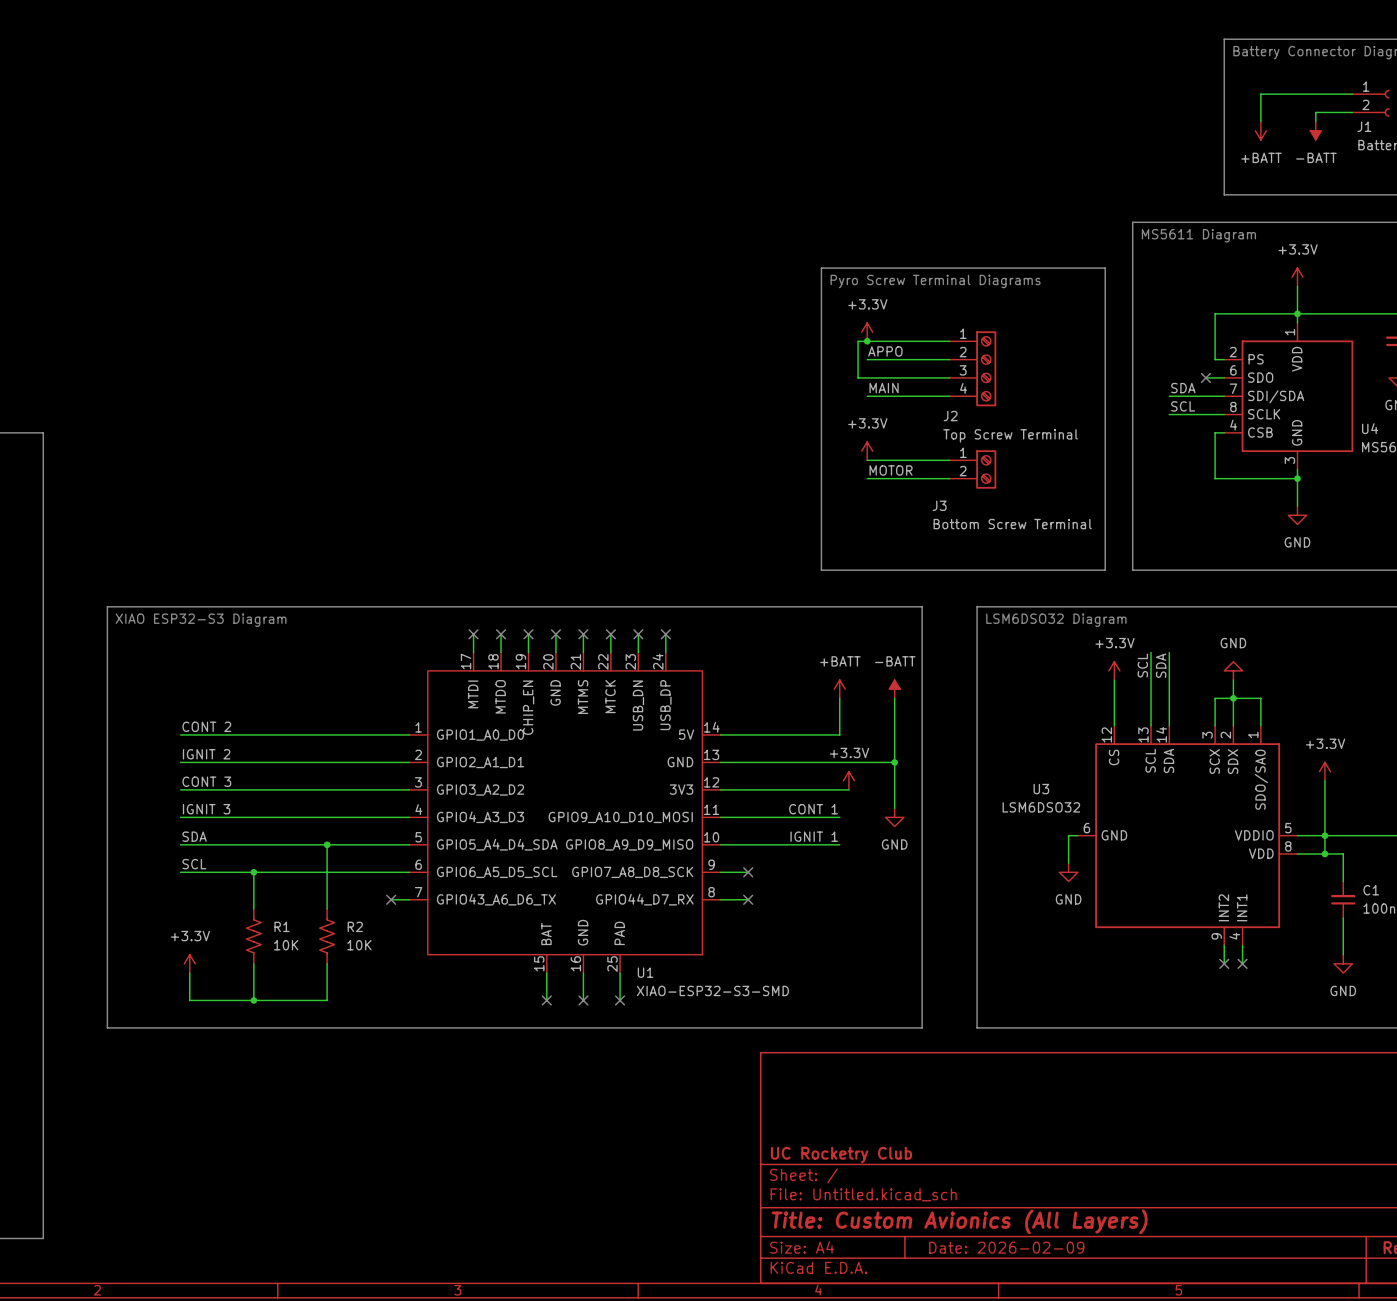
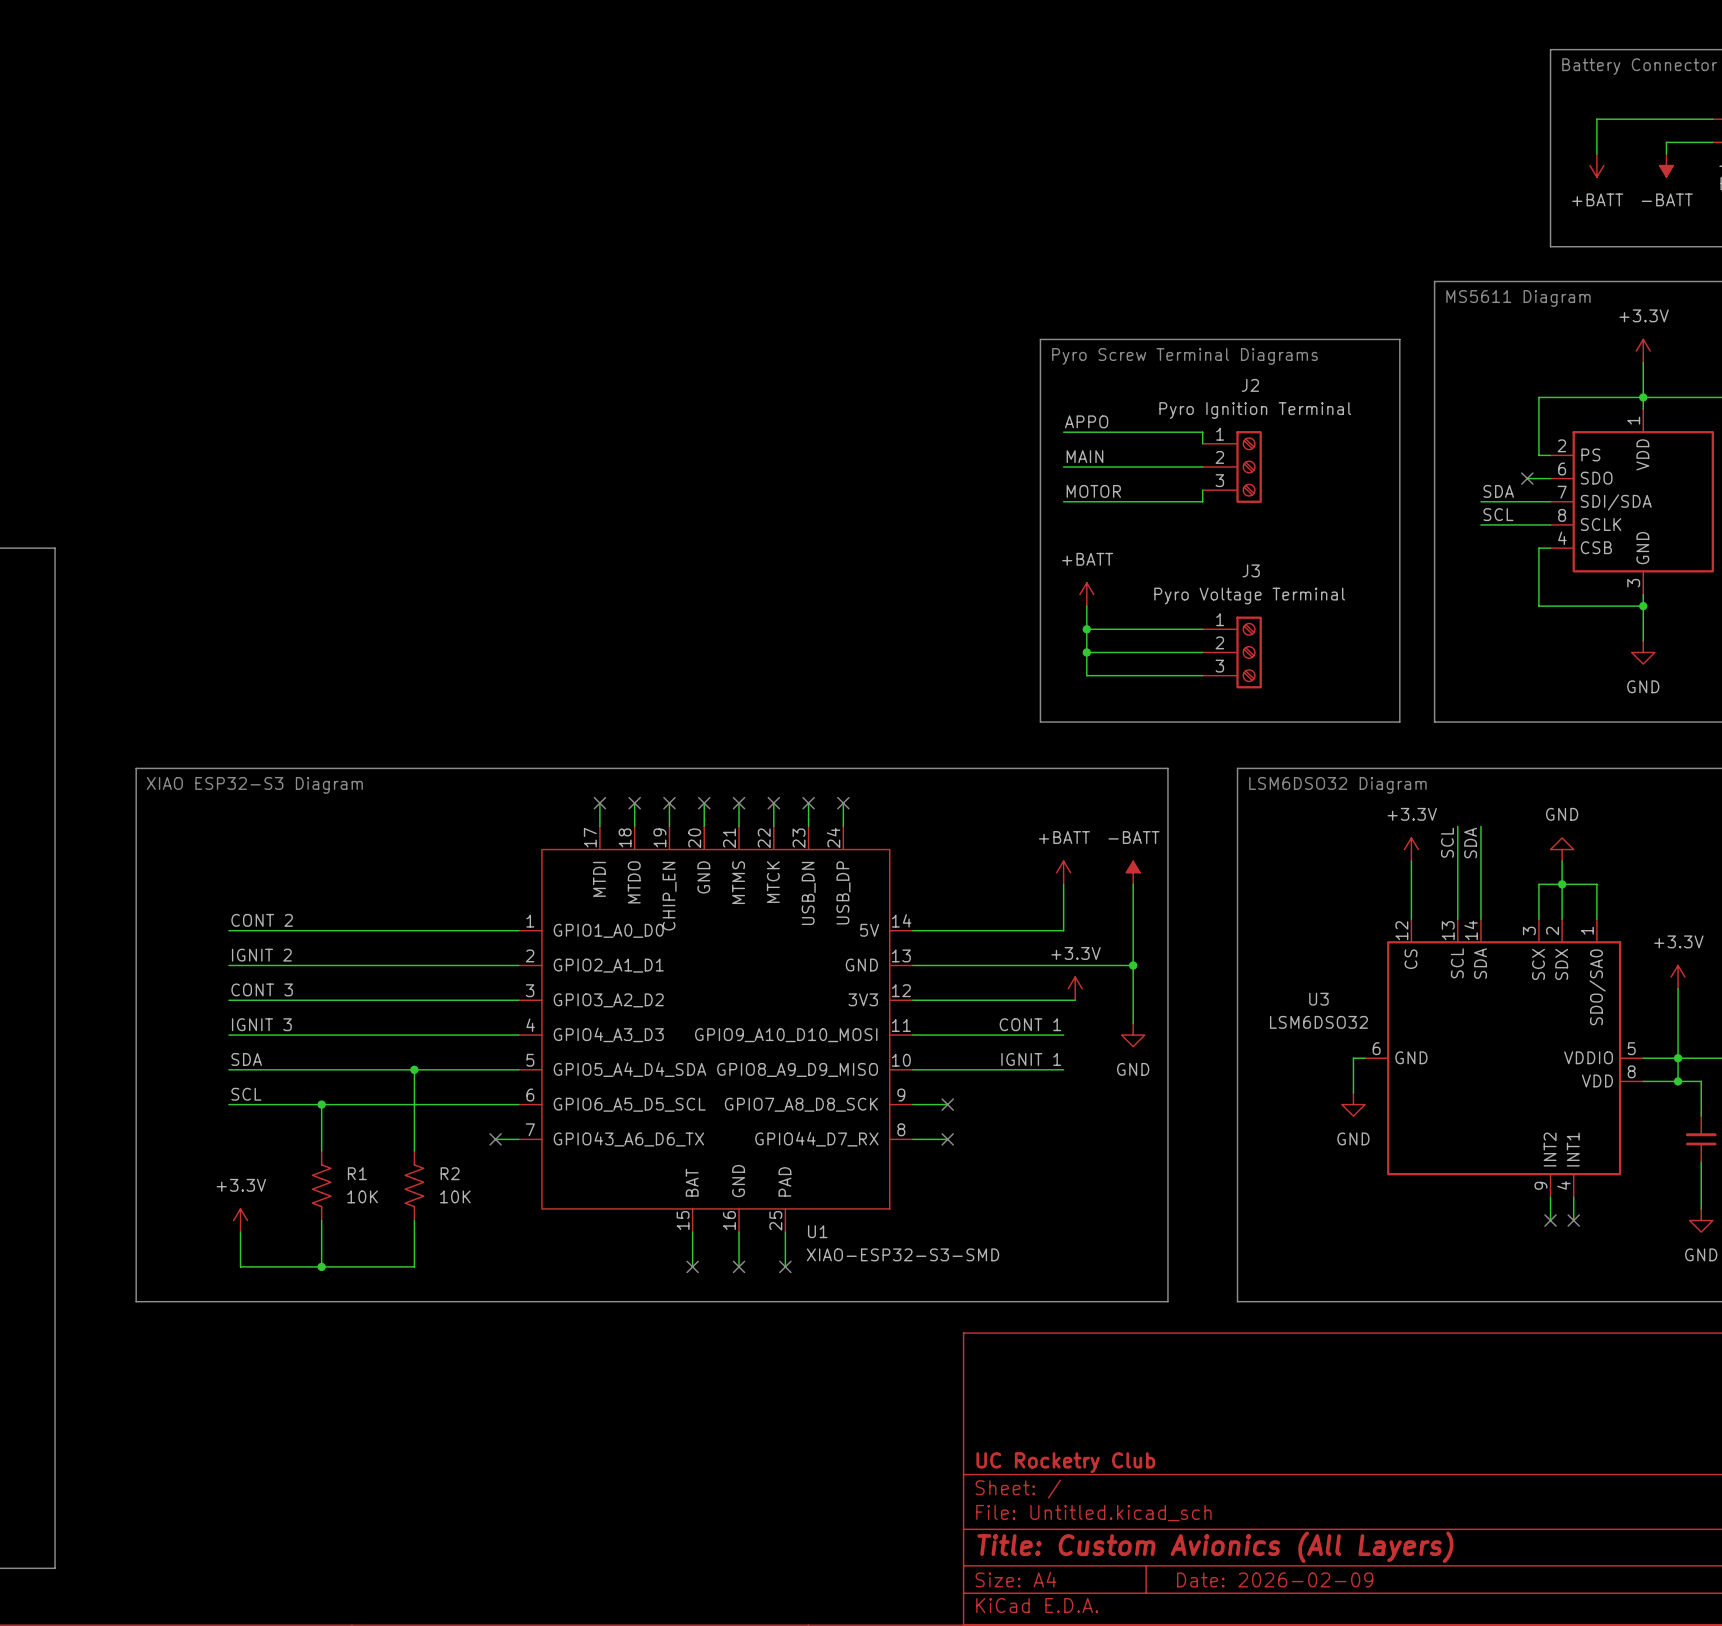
J2 symbol: [949, 331, 997, 407] -> [1202, 431, 1262, 503]
power symbol: +3.3V (867, 332) -> none
wire: (858, 341) (858, 377) (949, 377) -> (1086, 432) (1063, 432)
junction: (867, 341) -> none
wire: none -> (1202, 432) (1202, 443)
label position: APPO (885, 351) -> APPO (1086, 421)
wire: (867, 359) (949, 359) -> none
wire: none -> (1063, 466) (1202, 466)
wire: none -> (1202, 490) (1202, 501)
label position: MAIN (884, 388) -> MAIN (1084, 456)
wire: none -> (1063, 501) (1098, 501)
J2 name position: J2 (950, 416) -> J2 (1250, 385)
J2 value: Top Screw Terminal (1010, 435) -> Pyro Ignition Terminal (1255, 410)
J3 symbol: [949, 450, 997, 489] -> [1202, 616, 1262, 689]
power symbol: +3.3V (867, 451) -> none
wire: (867, 460) (949, 460) -> none
power symbol: none -> +BATT (1086, 594)
label position: MOTOR (891, 470) -> MOTOR (1093, 491)
wire: none -> (1086, 606) (1086, 675) (1202, 675)
wire: (867, 478) (949, 478) -> none
wire: none -> (1086, 629) (1202, 629)
junction: none -> (1086, 629)
J3 name position: J3 (939, 505) -> J3 (1251, 570)
wire: none -> (1086, 652) (1202, 652)
junction: none -> (1086, 652)
J3 value: Bottom Screw Terminal (1012, 524) -> Pyro Voltage Terminal (1249, 596)

